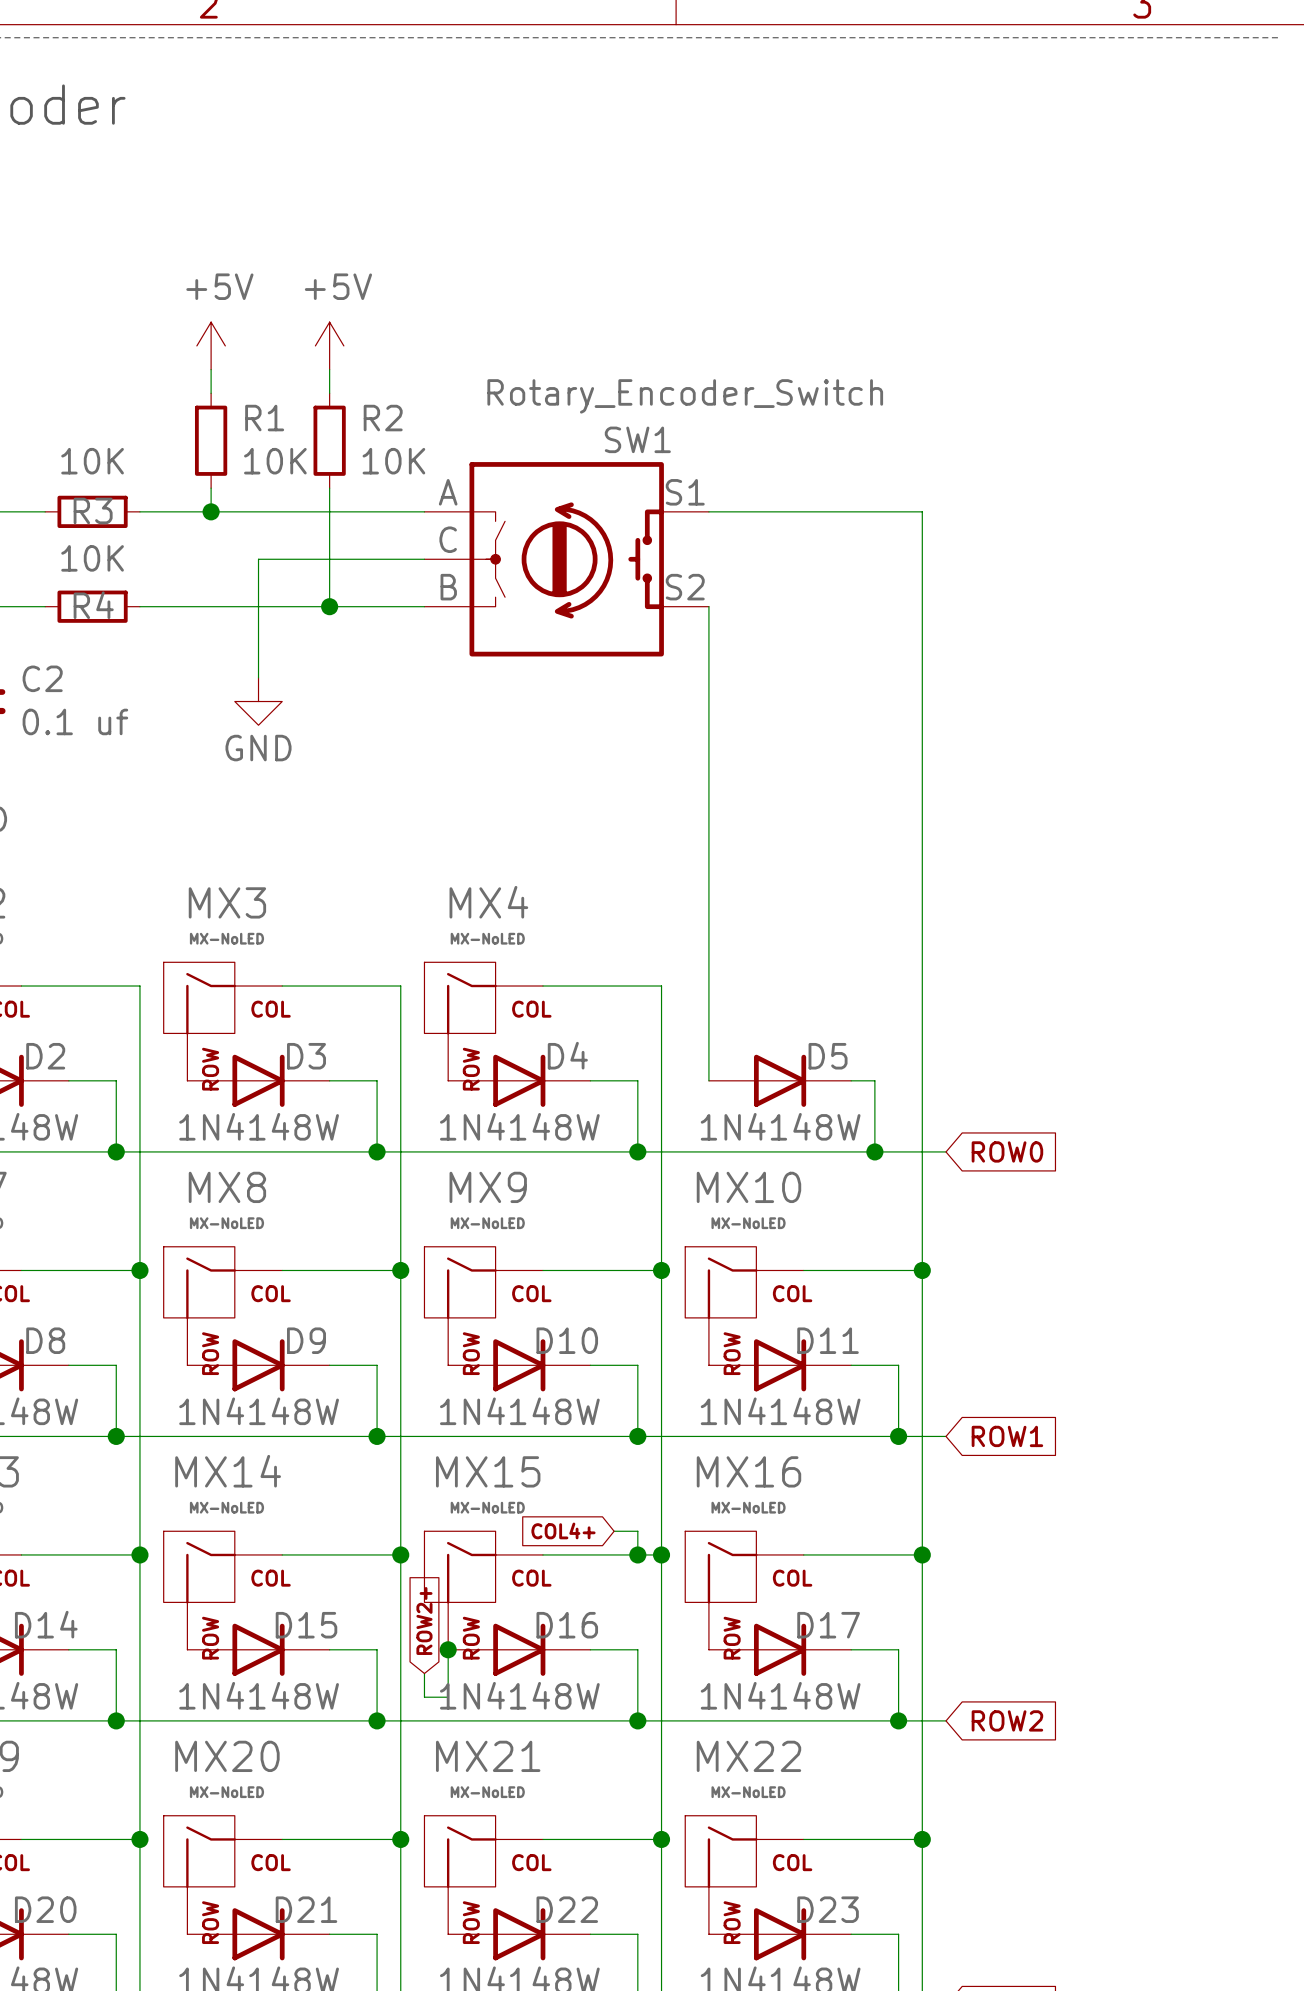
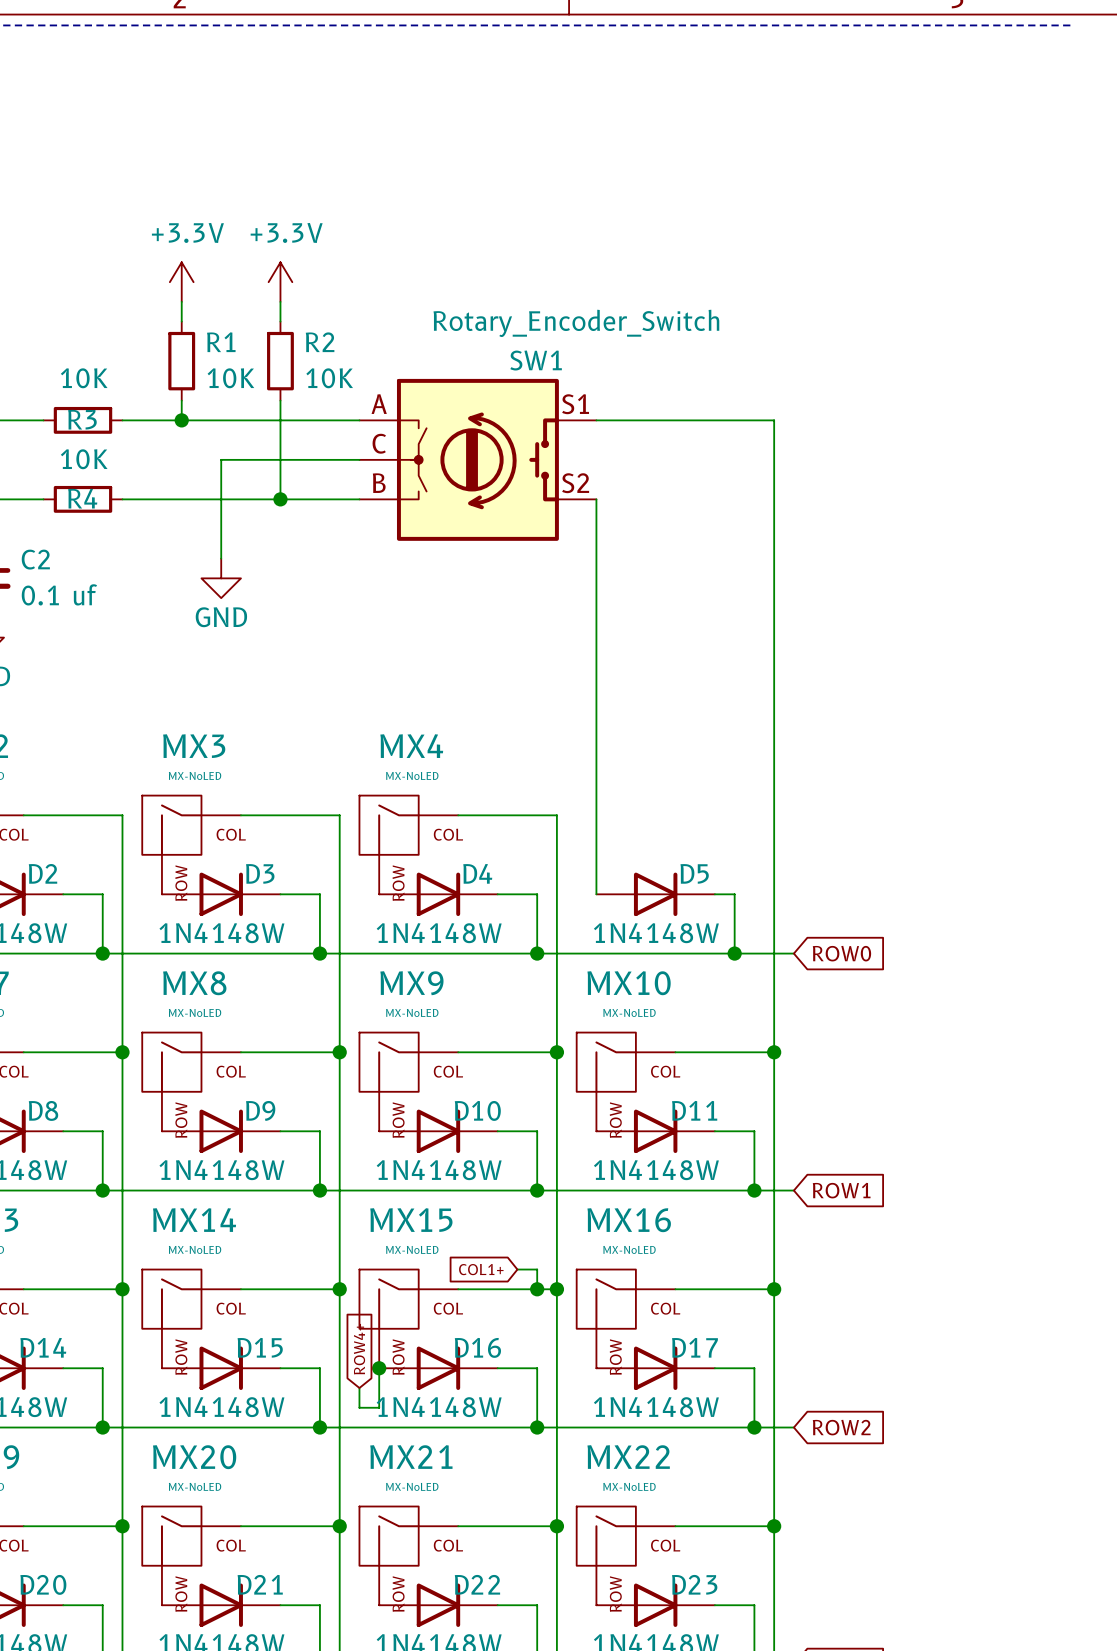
power symbol: +5V (211, 345) -> +3.3V (181, 282)
power symbol: +5V (329, 345) -> +3.3V (280, 282)
global label: COL4+ (563, 1530) -> COL1+ (481, 1269)
global label: ROW2+ (424, 1620) -> ROW4+ (359, 1349)

